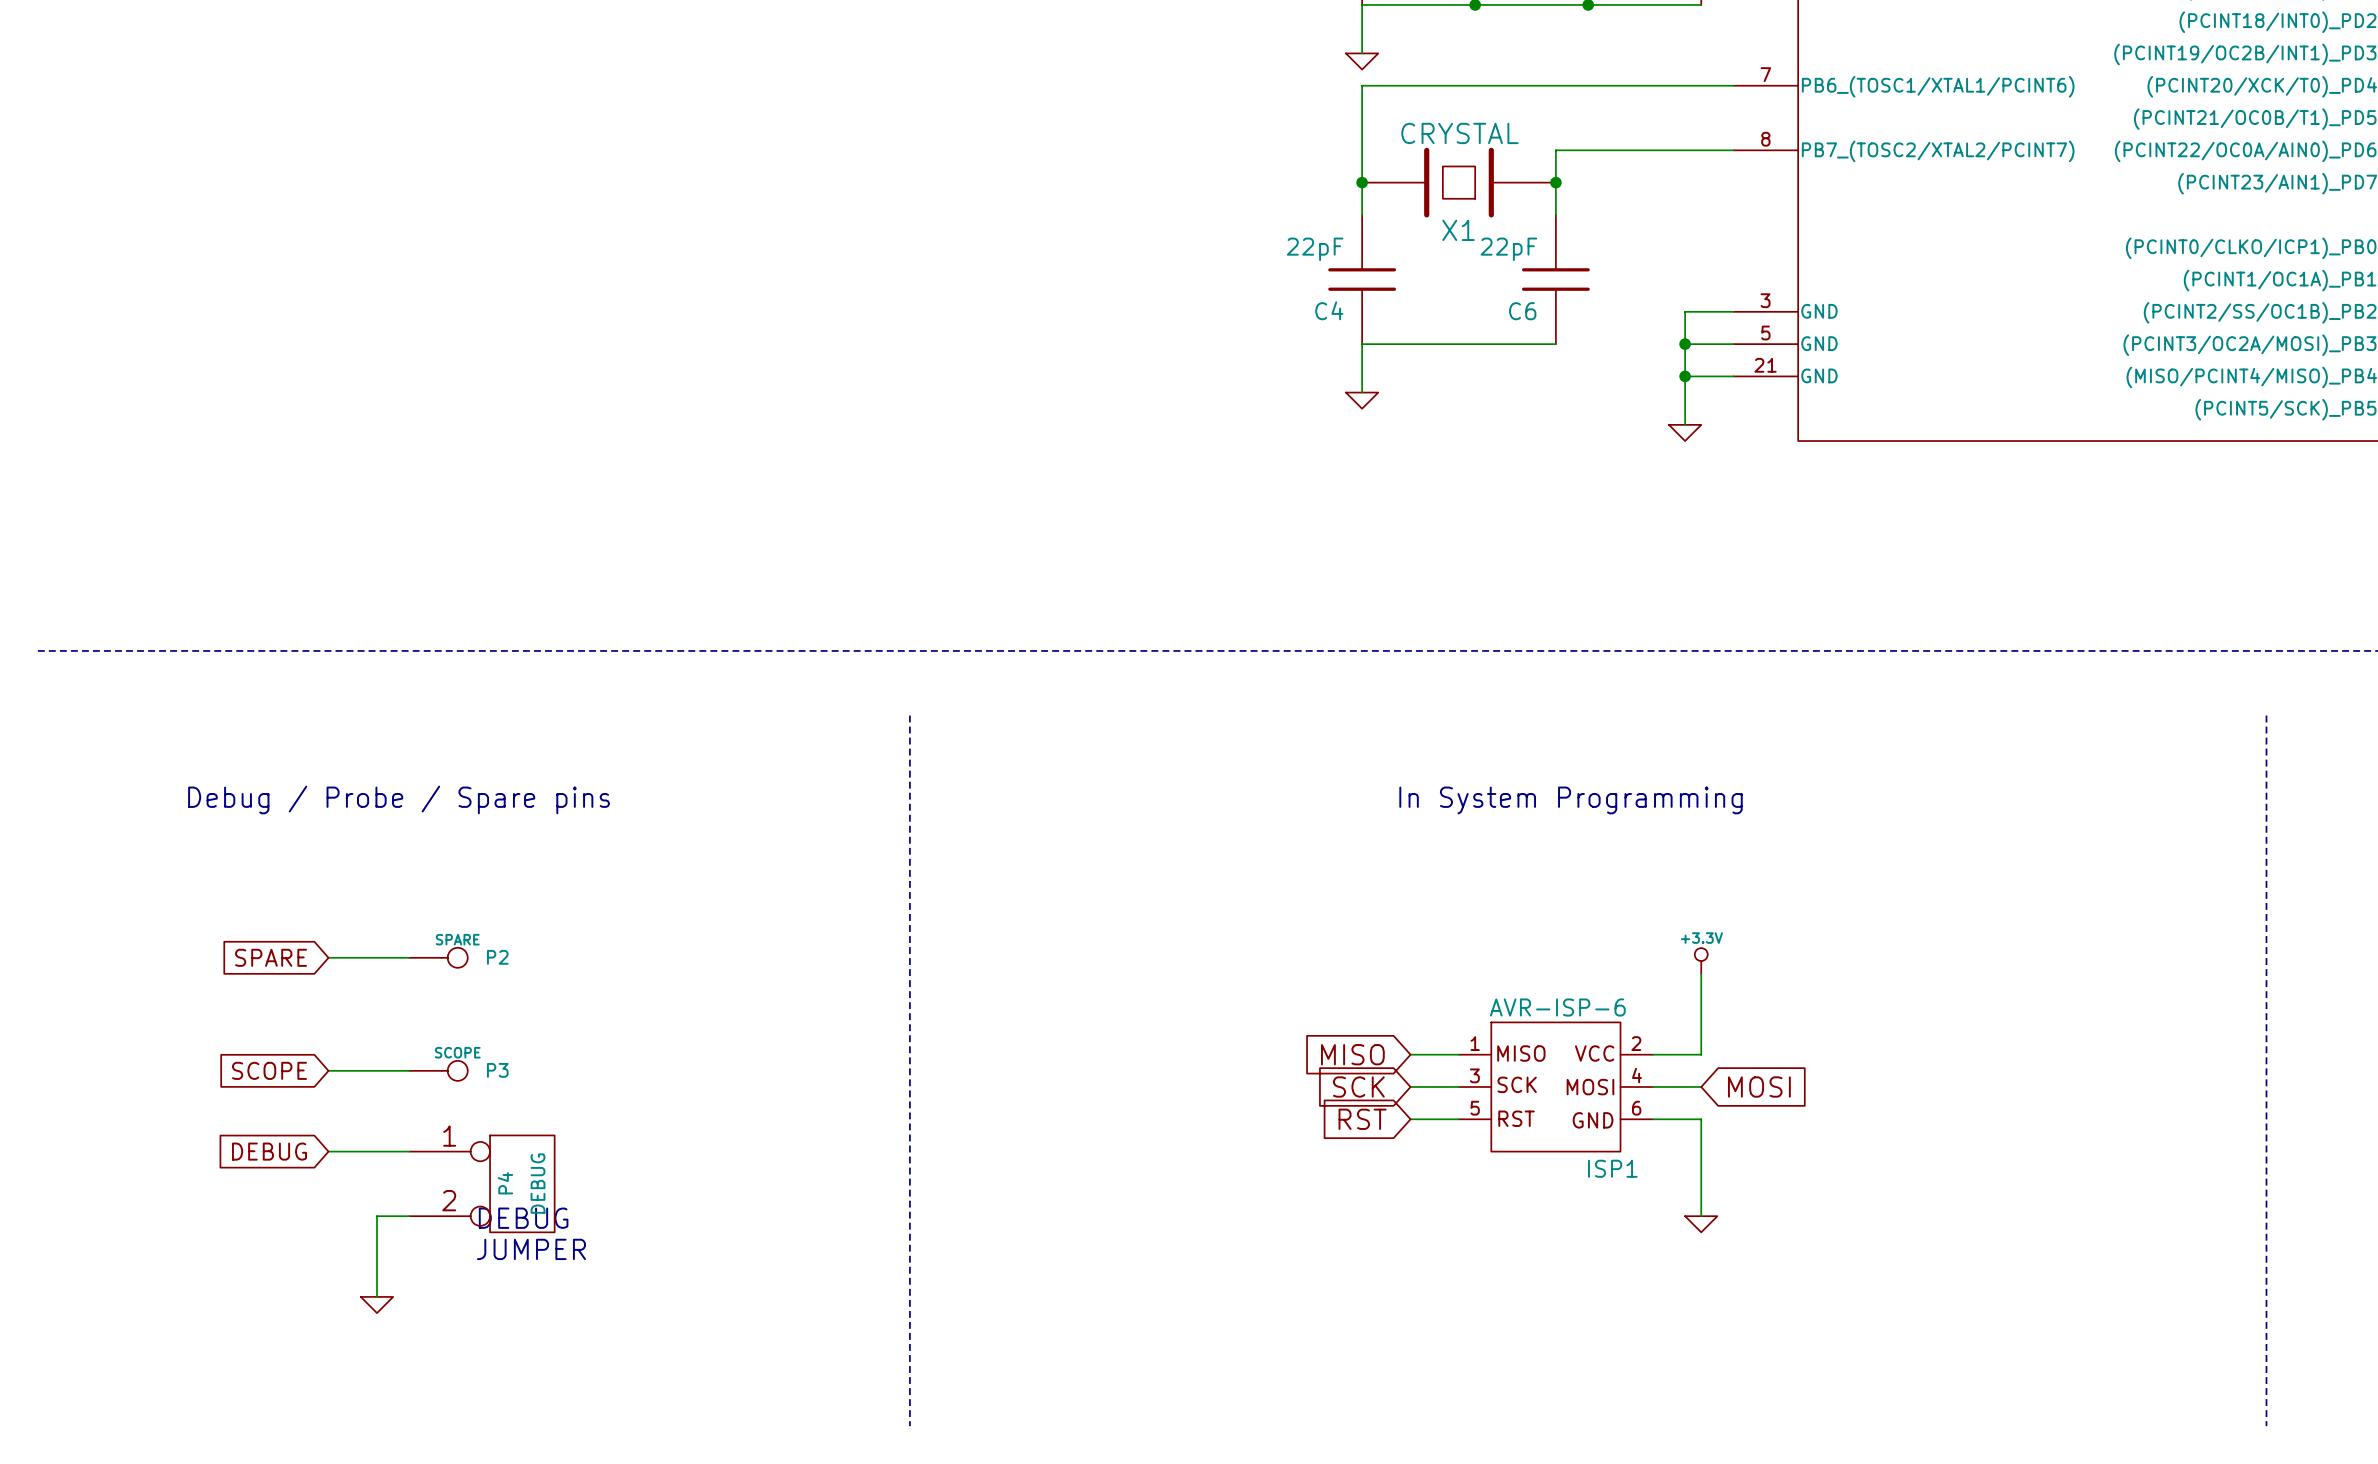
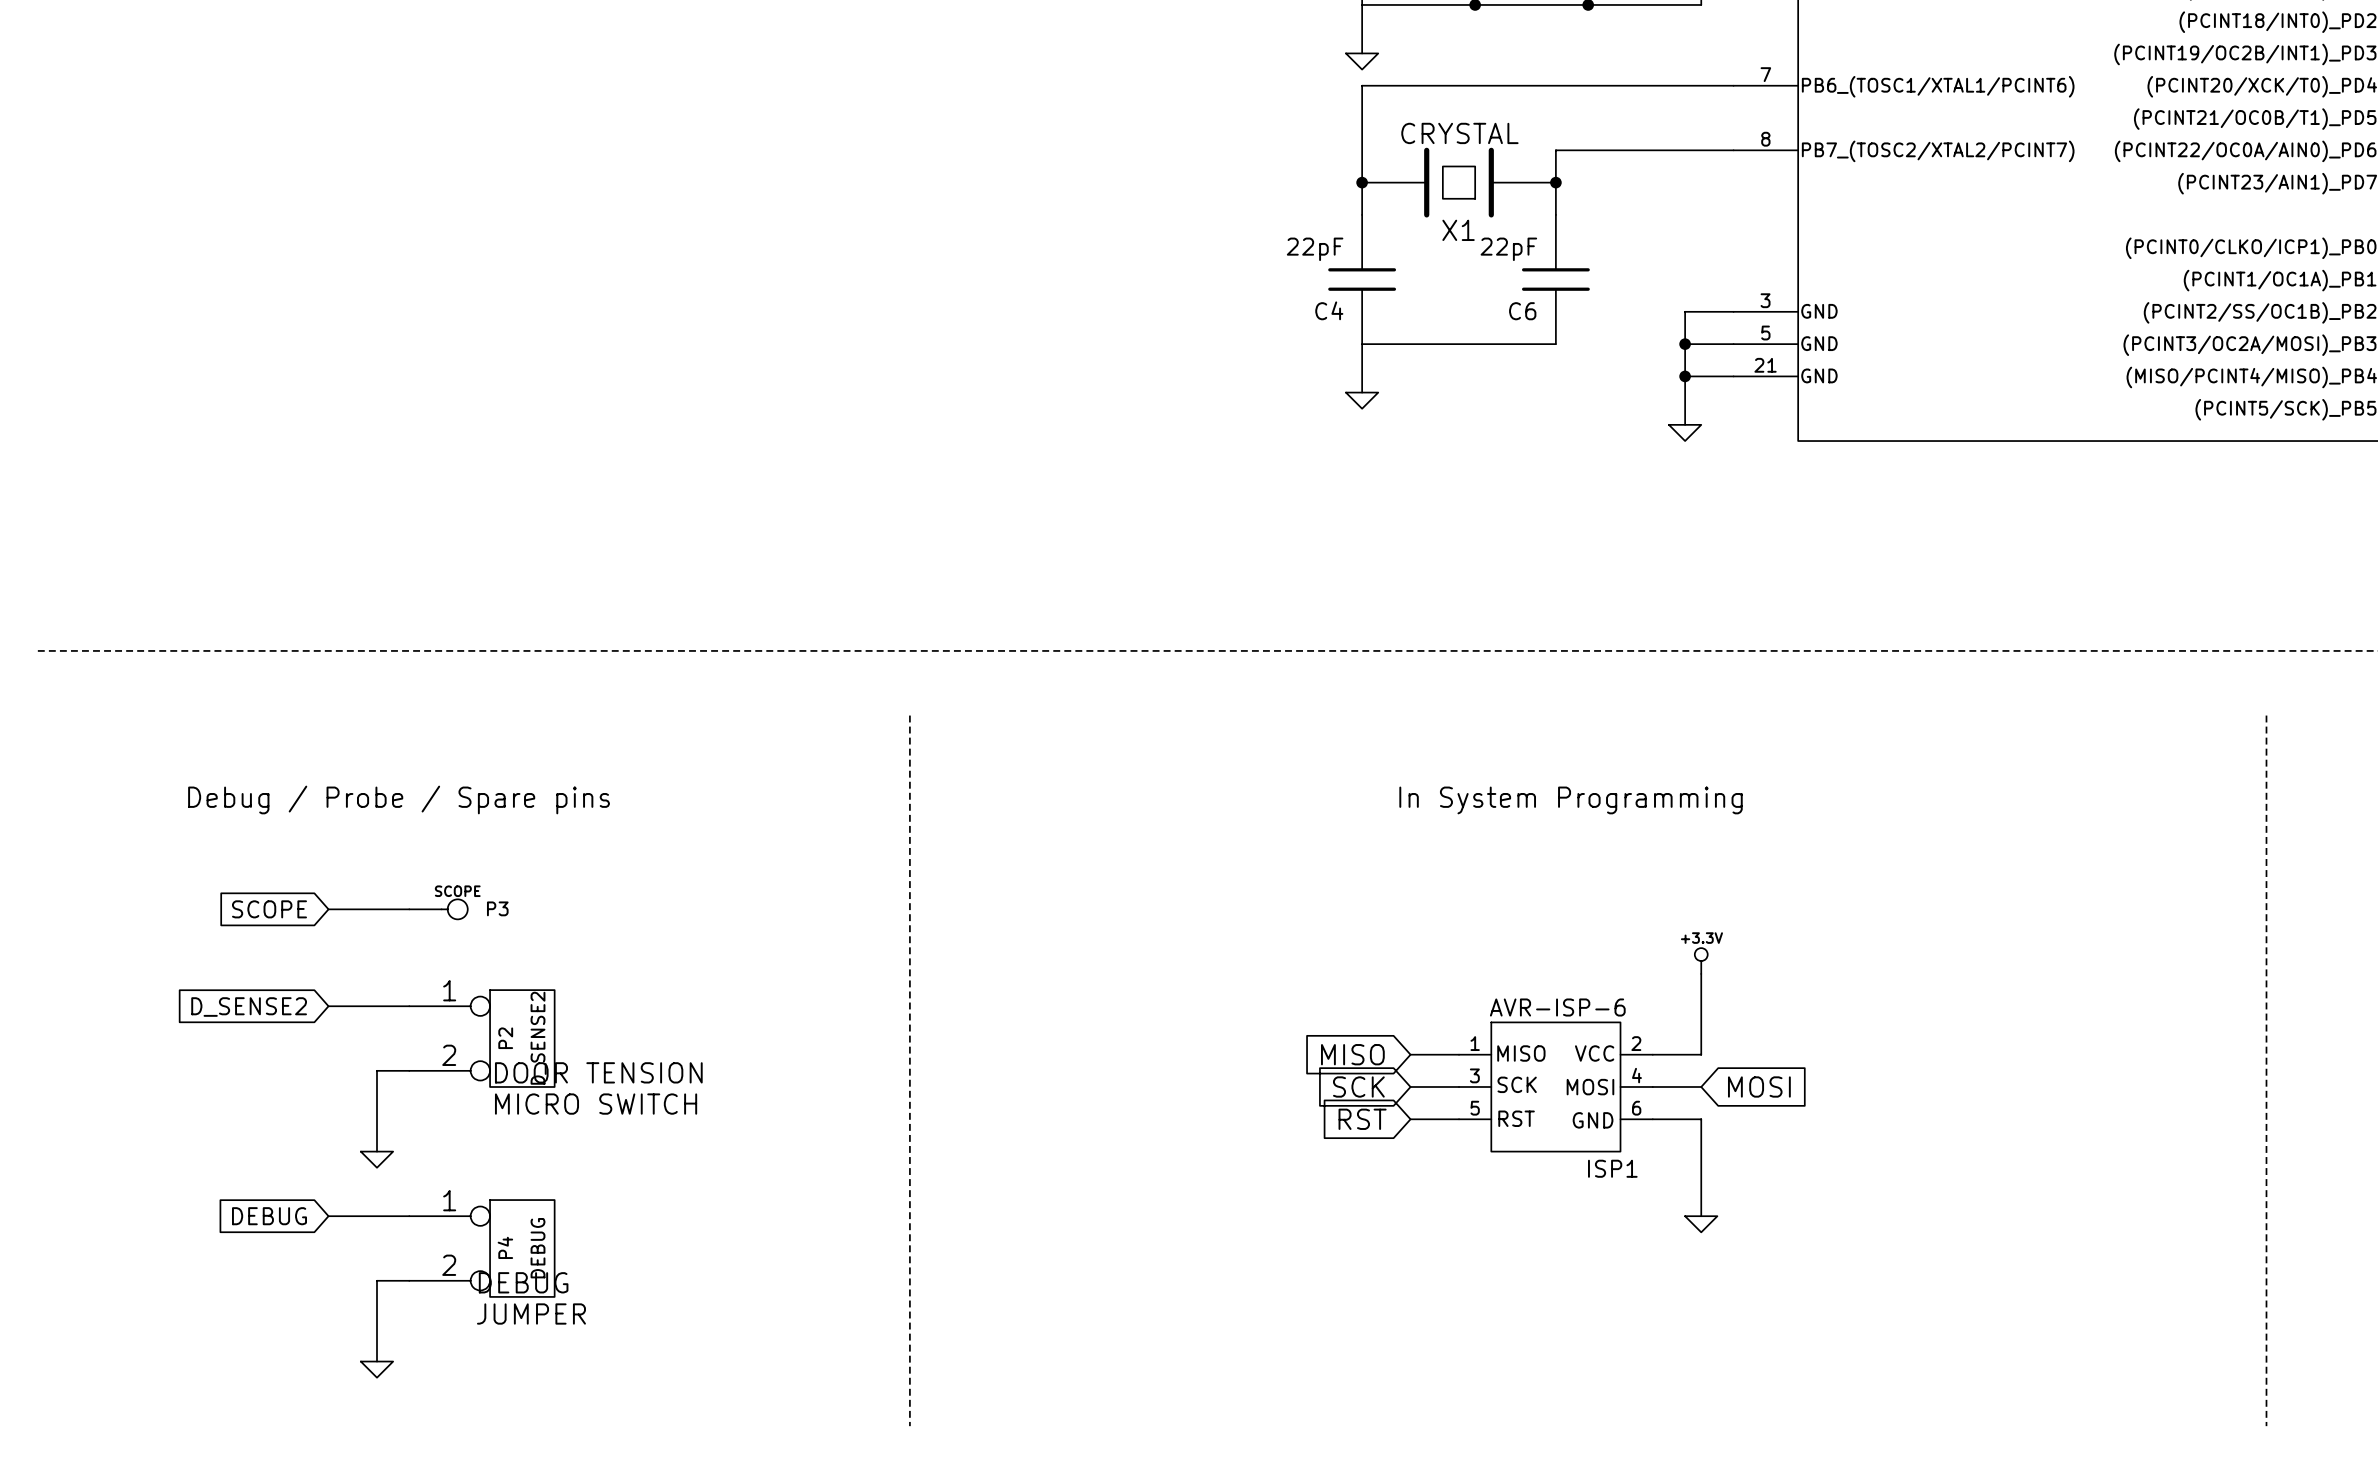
P2 value: SPARE (457, 939) -> D_SENSE2 (538, 1038)
P2 symbol: [409, 947, 468, 968] -> [409, 990, 555, 1088]
global label: SPARE (271, 957) -> none
wire: (328, 957) (409, 957) -> (328, 909) (409, 909)
P2 name position: P2 (497, 957) -> P2 (505, 1038)
global label: none -> D_SENSE2 (249, 1007)
global label position: SCOPE (269, 1070) -> SCOPE (269, 909)
wire: (328, 1070) (376, 1070) -> (376, 1151) (376, 1070)
P3 position: (438, 1070) -> (438, 909)
text: none -> DOOR TENSION (598, 1072)
text: none -> MICRO SWITCH (596, 1104)
global label position: DEBUG (269, 1151) -> DEBUG (269, 1216)
wire: (328, 1151) (409, 1151) -> (328, 1006) (409, 1006)
power symbol: none -> (376, 1159)
P4 position: (481, 1183) -> (481, 1248)
wire: none -> (328, 1216) (376, 1216)
wire: (376, 1216) (376, 1280) -> (409, 1280) (376, 1280)
text position: DEBUG (523, 1218) -> DEBUG (523, 1282)
text position: JUMPER (531, 1249) -> JUMPER (531, 1314)
wire: none -> (376, 1296) (376, 1361)
power symbol position: (376, 1305) -> (376, 1369)

